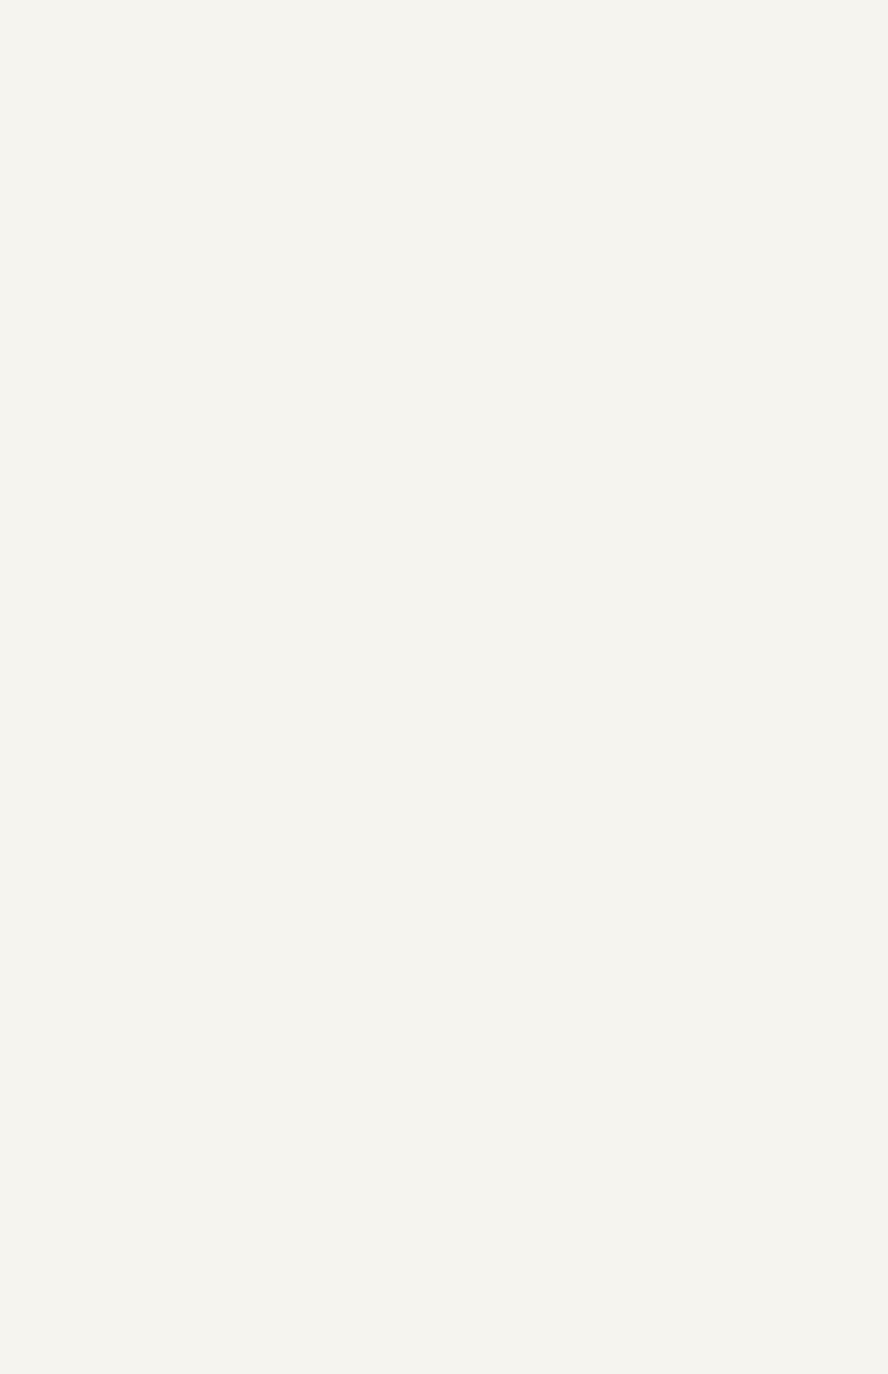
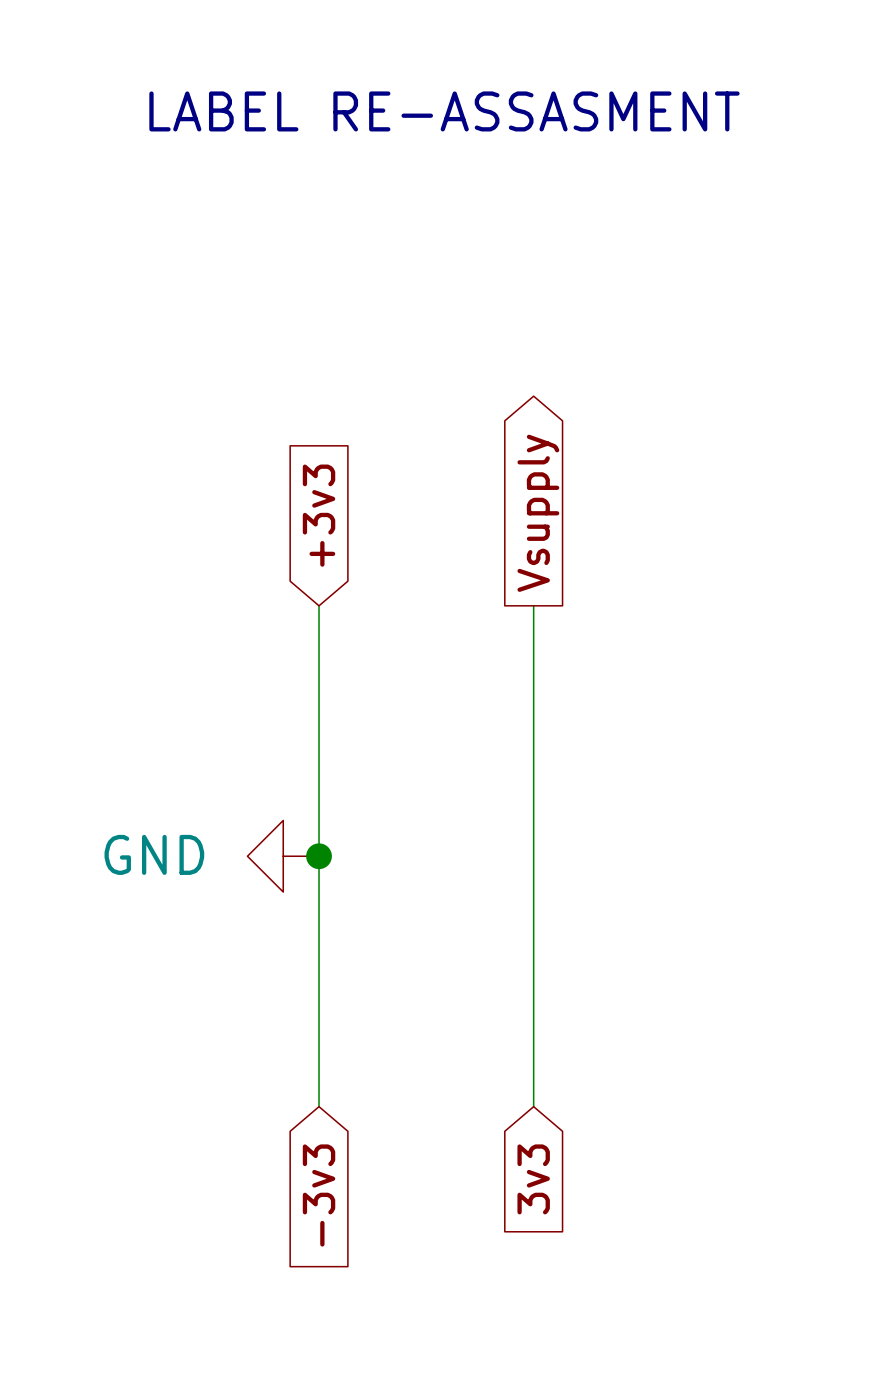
text: none -> LABEL RE-ASSASMENT (444, 111)
global label: none -> Vsupply (538, 513)
global label: none -> +3v3 (319, 515)
wire: none -> (319, 605) (319, 1106)
wire: none -> (533, 605) (533, 1106)
power symbol: none -> GND (283, 856)
junction: none -> (319, 856)
global label: none -> 3v3 (533, 1179)
global label: none -> -3v3 (319, 1195)

